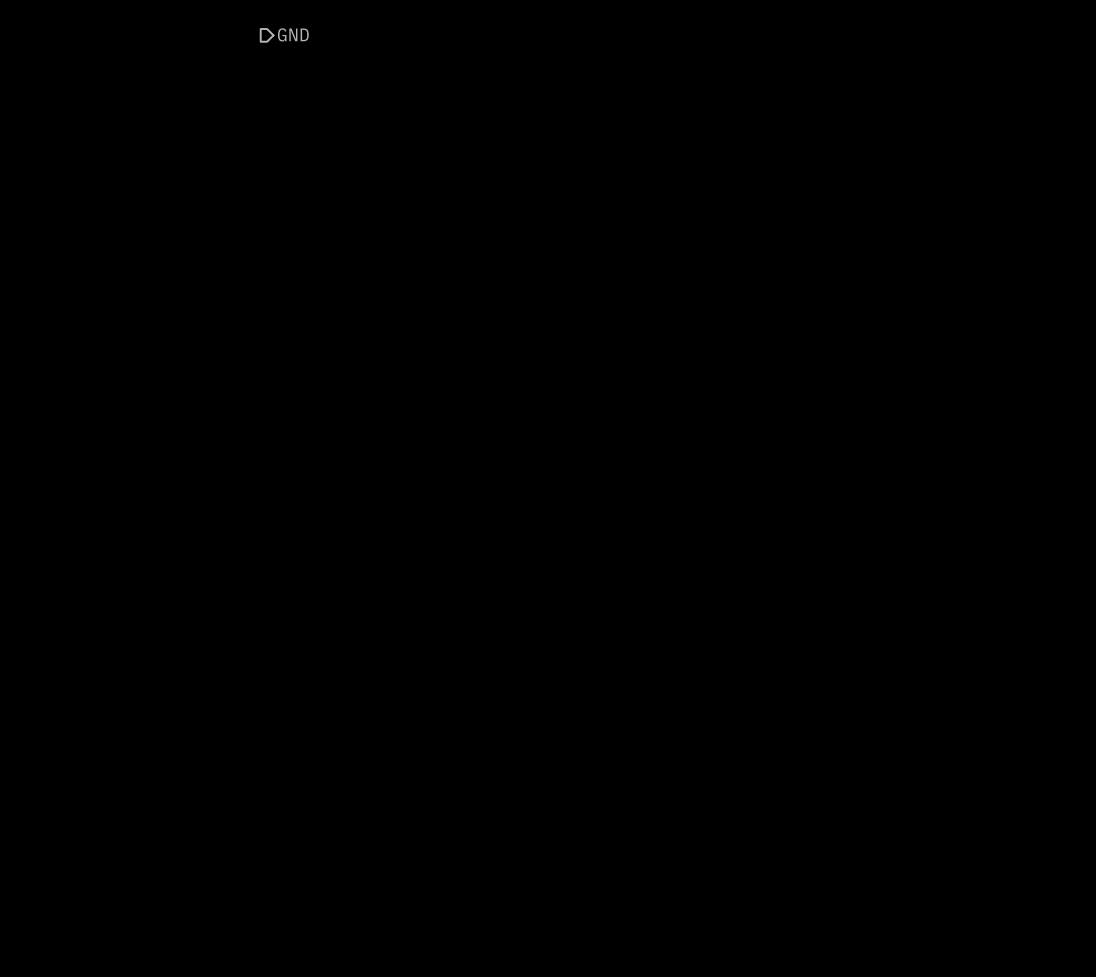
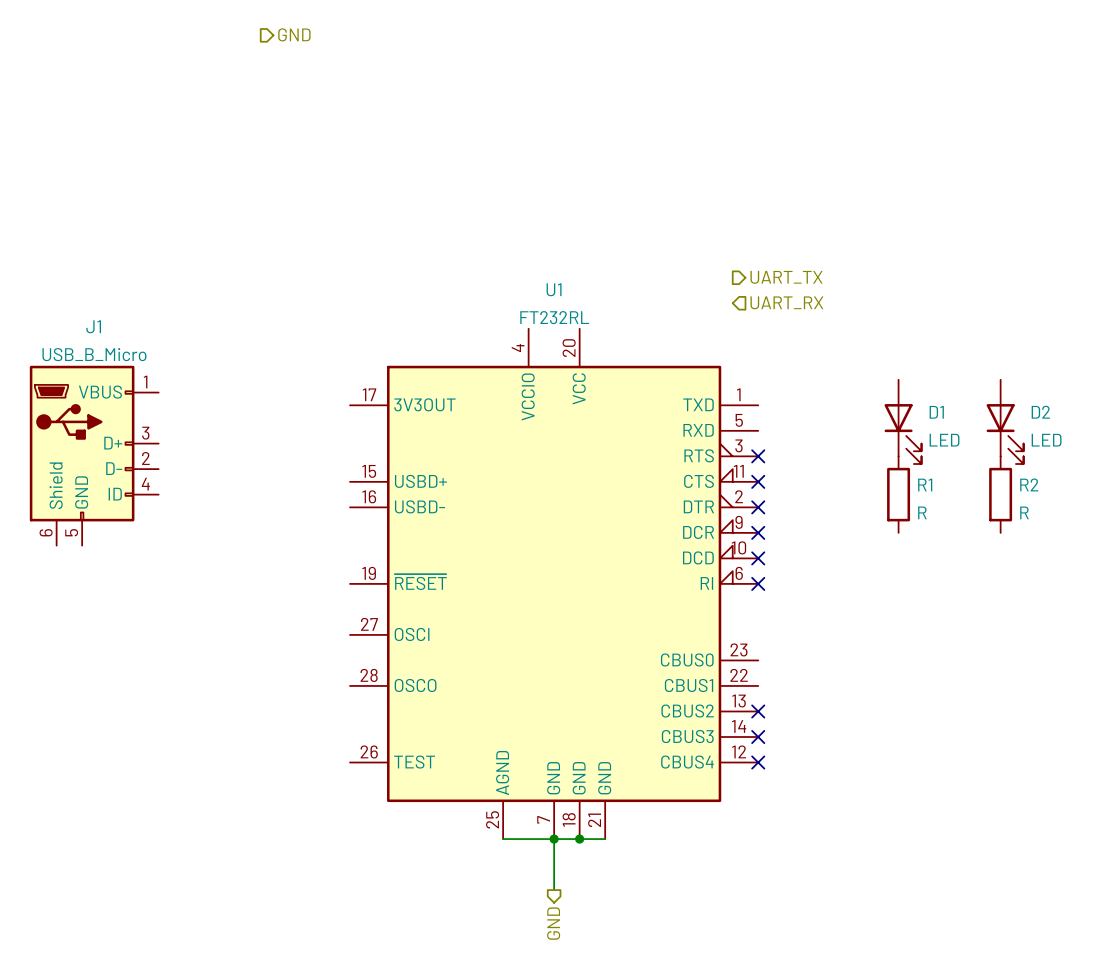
hierarchical label: none -> UART_TX (786, 277)
hierarchical label: none -> UART_RX (786, 302)
D1: none -> LED (903, 421)
D2: none -> LED (1005, 421)
J1: none -> USB_B_Micro (94, 455)
no-connect mark: none -> (758, 456)
no-connect mark: none -> (758, 481)
R1: none -> R (898, 494)
R2: none -> R (1000, 494)
no-connect mark: none -> (758, 507)
no-connect mark: none -> (758, 532)
no-connect mark: none -> (758, 558)
U1: none -> FT232RL (554, 583)
no-connect mark: none -> (758, 583)
no-connect mark: none -> (758, 711)
no-connect mark: none -> (758, 737)
no-connect mark: none -> (758, 762)
wire: none -> (503, 839) (605, 839)
wire: none -> (554, 839) (554, 890)
junction: none -> (554, 839)
junction: none -> (579, 839)
hierarchical label: none -> GND (553, 923)

